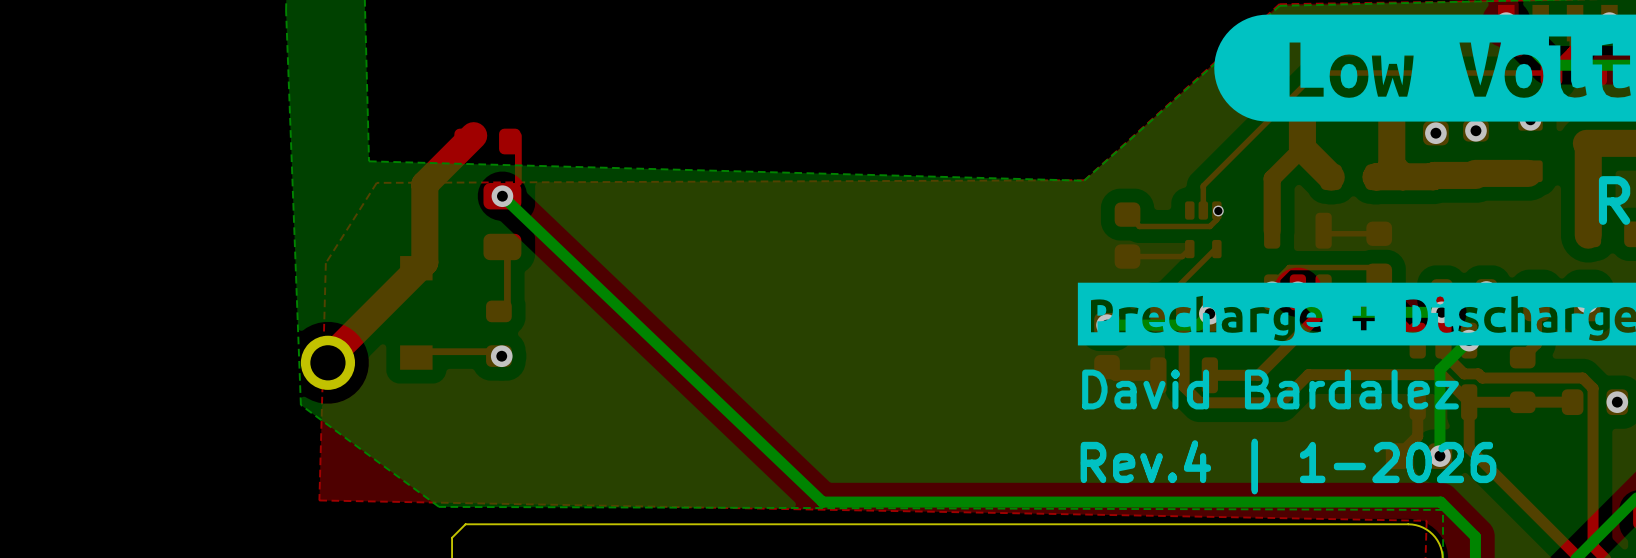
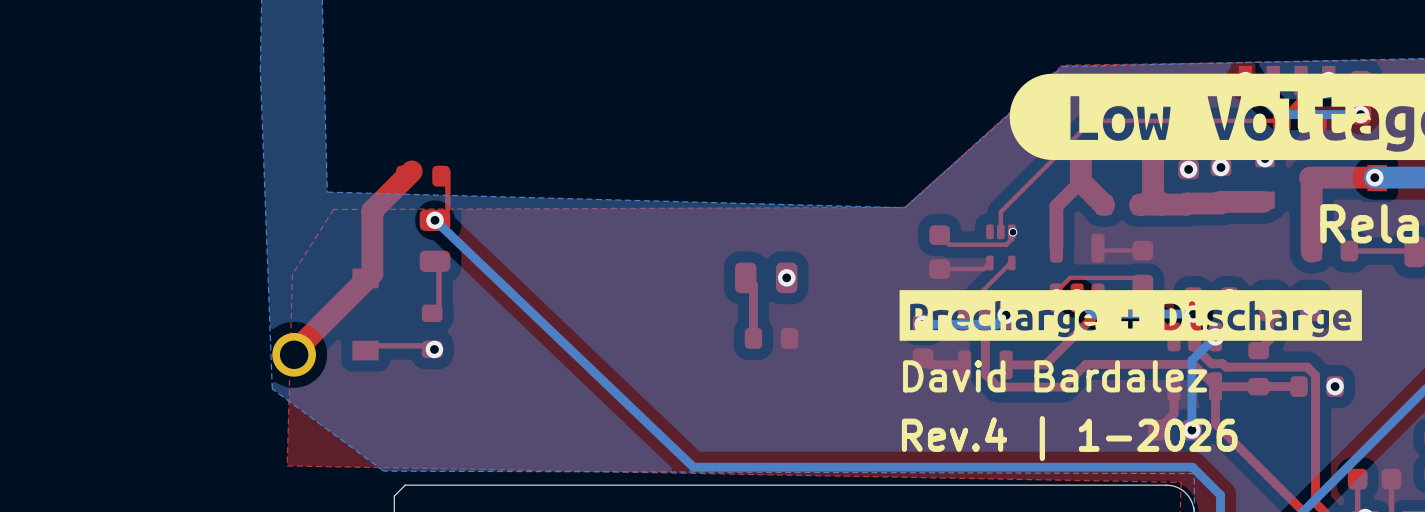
top track: none -> (745, 277) (753, 285) (753, 338)
part: none -> (766, 277)
via: none -> (786, 277)
part: none -> (771, 338)

